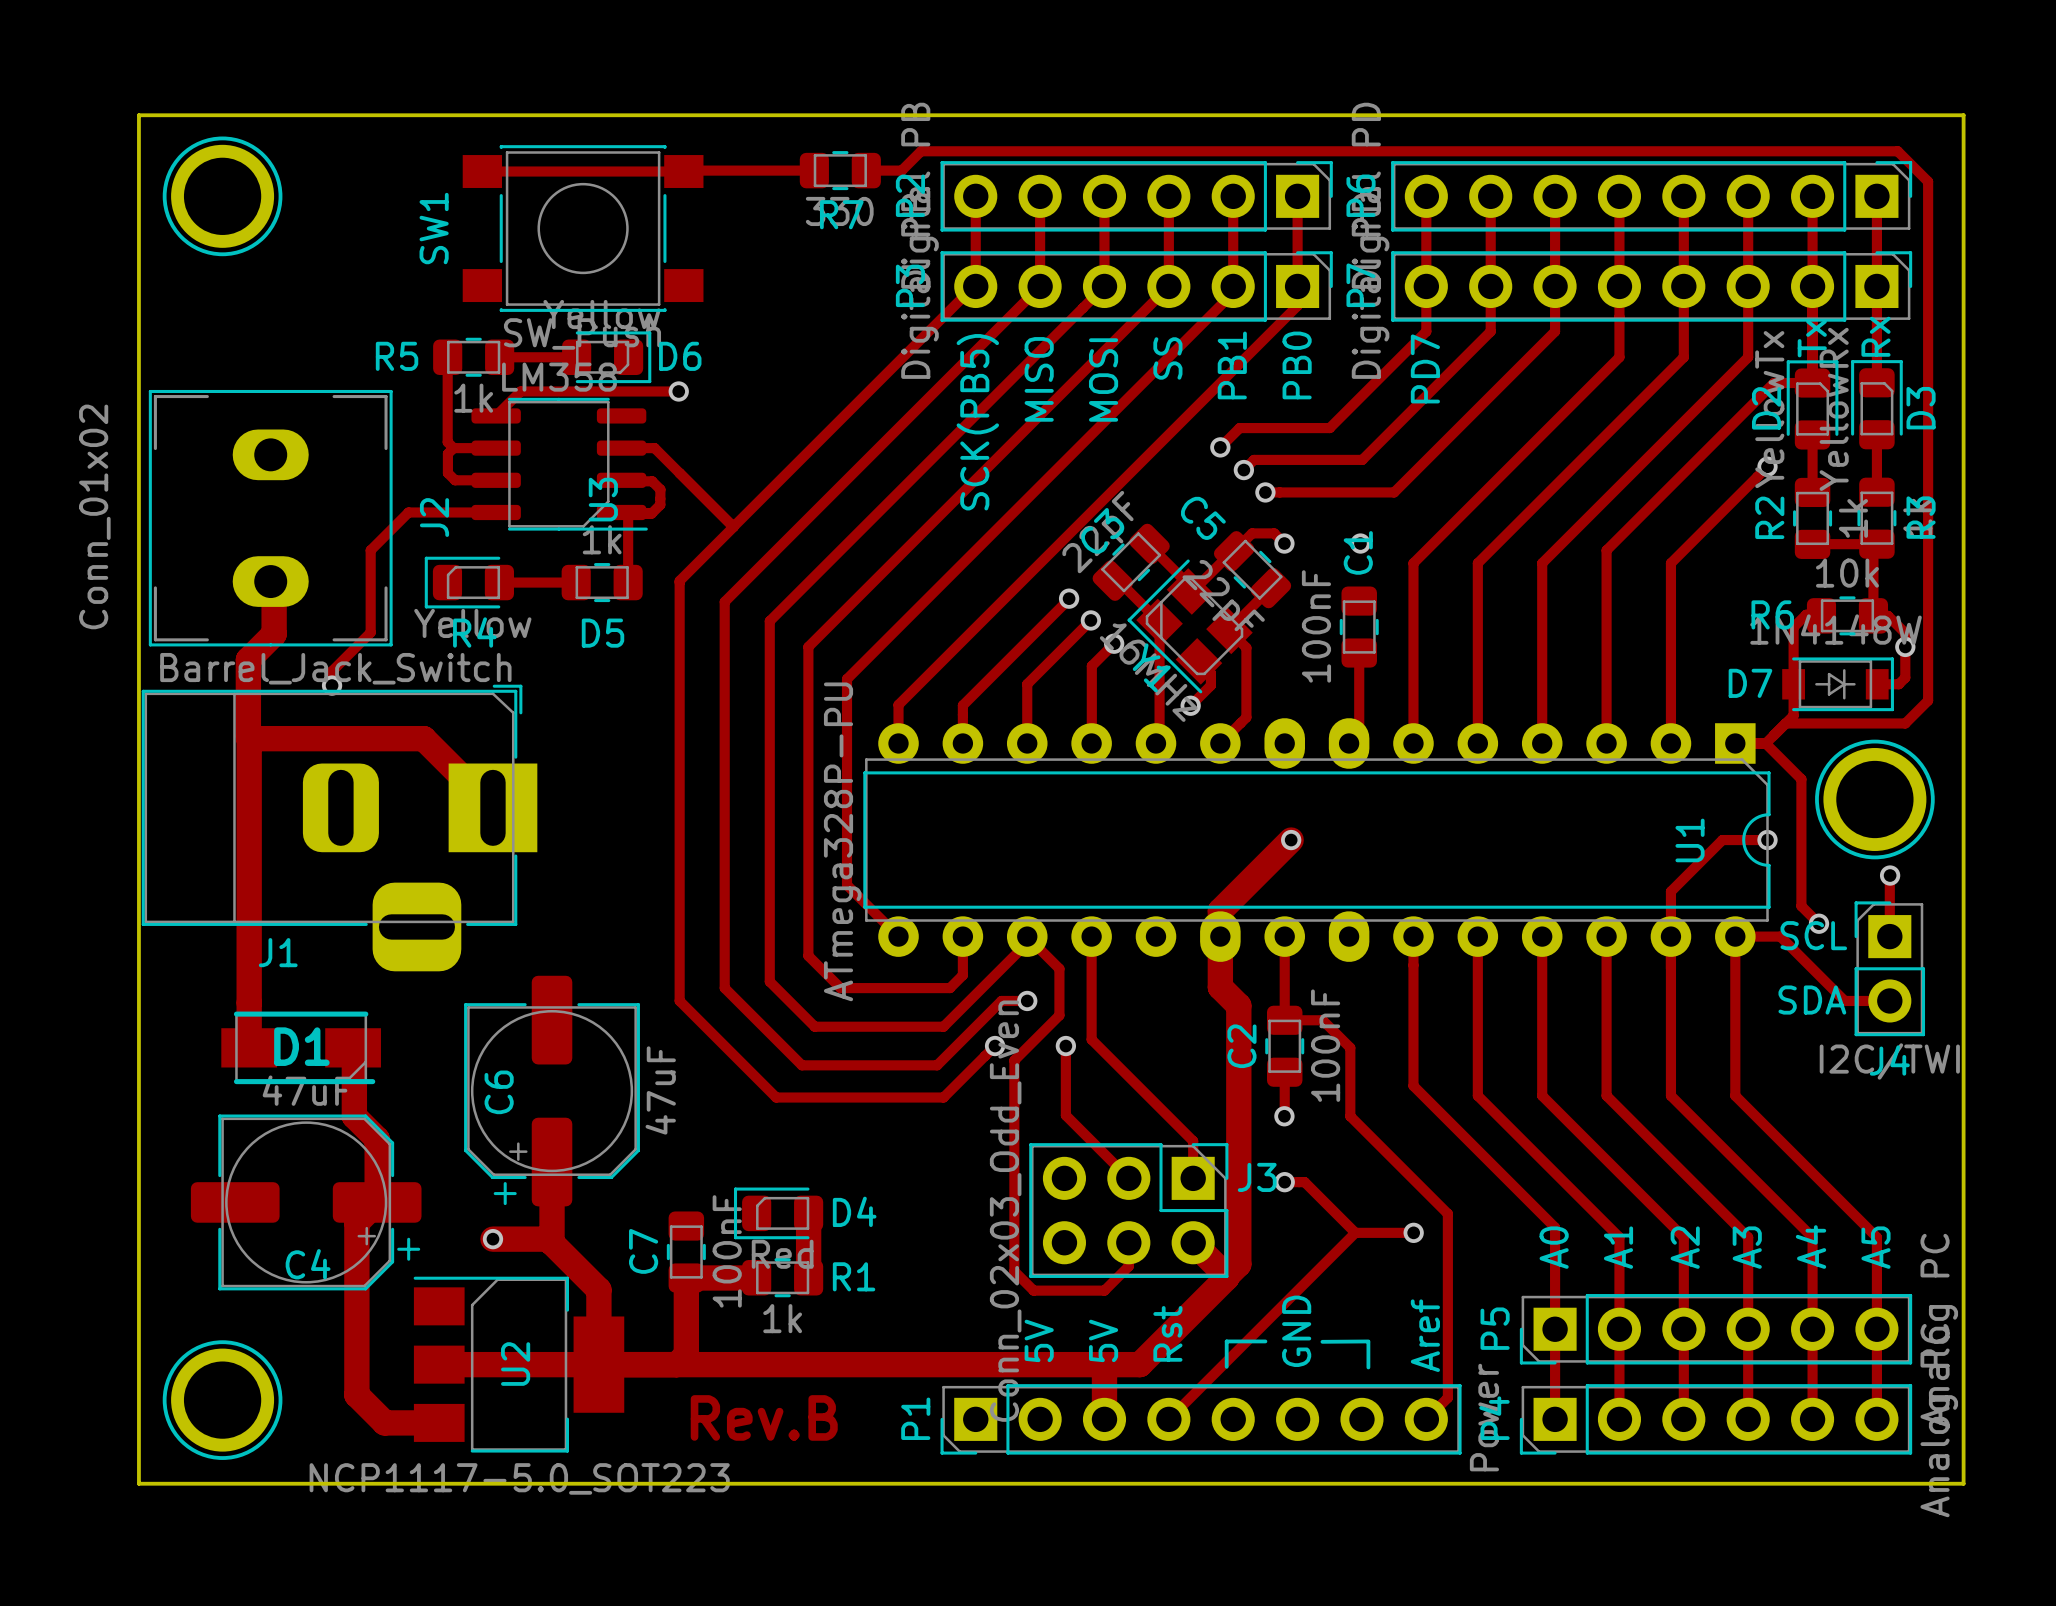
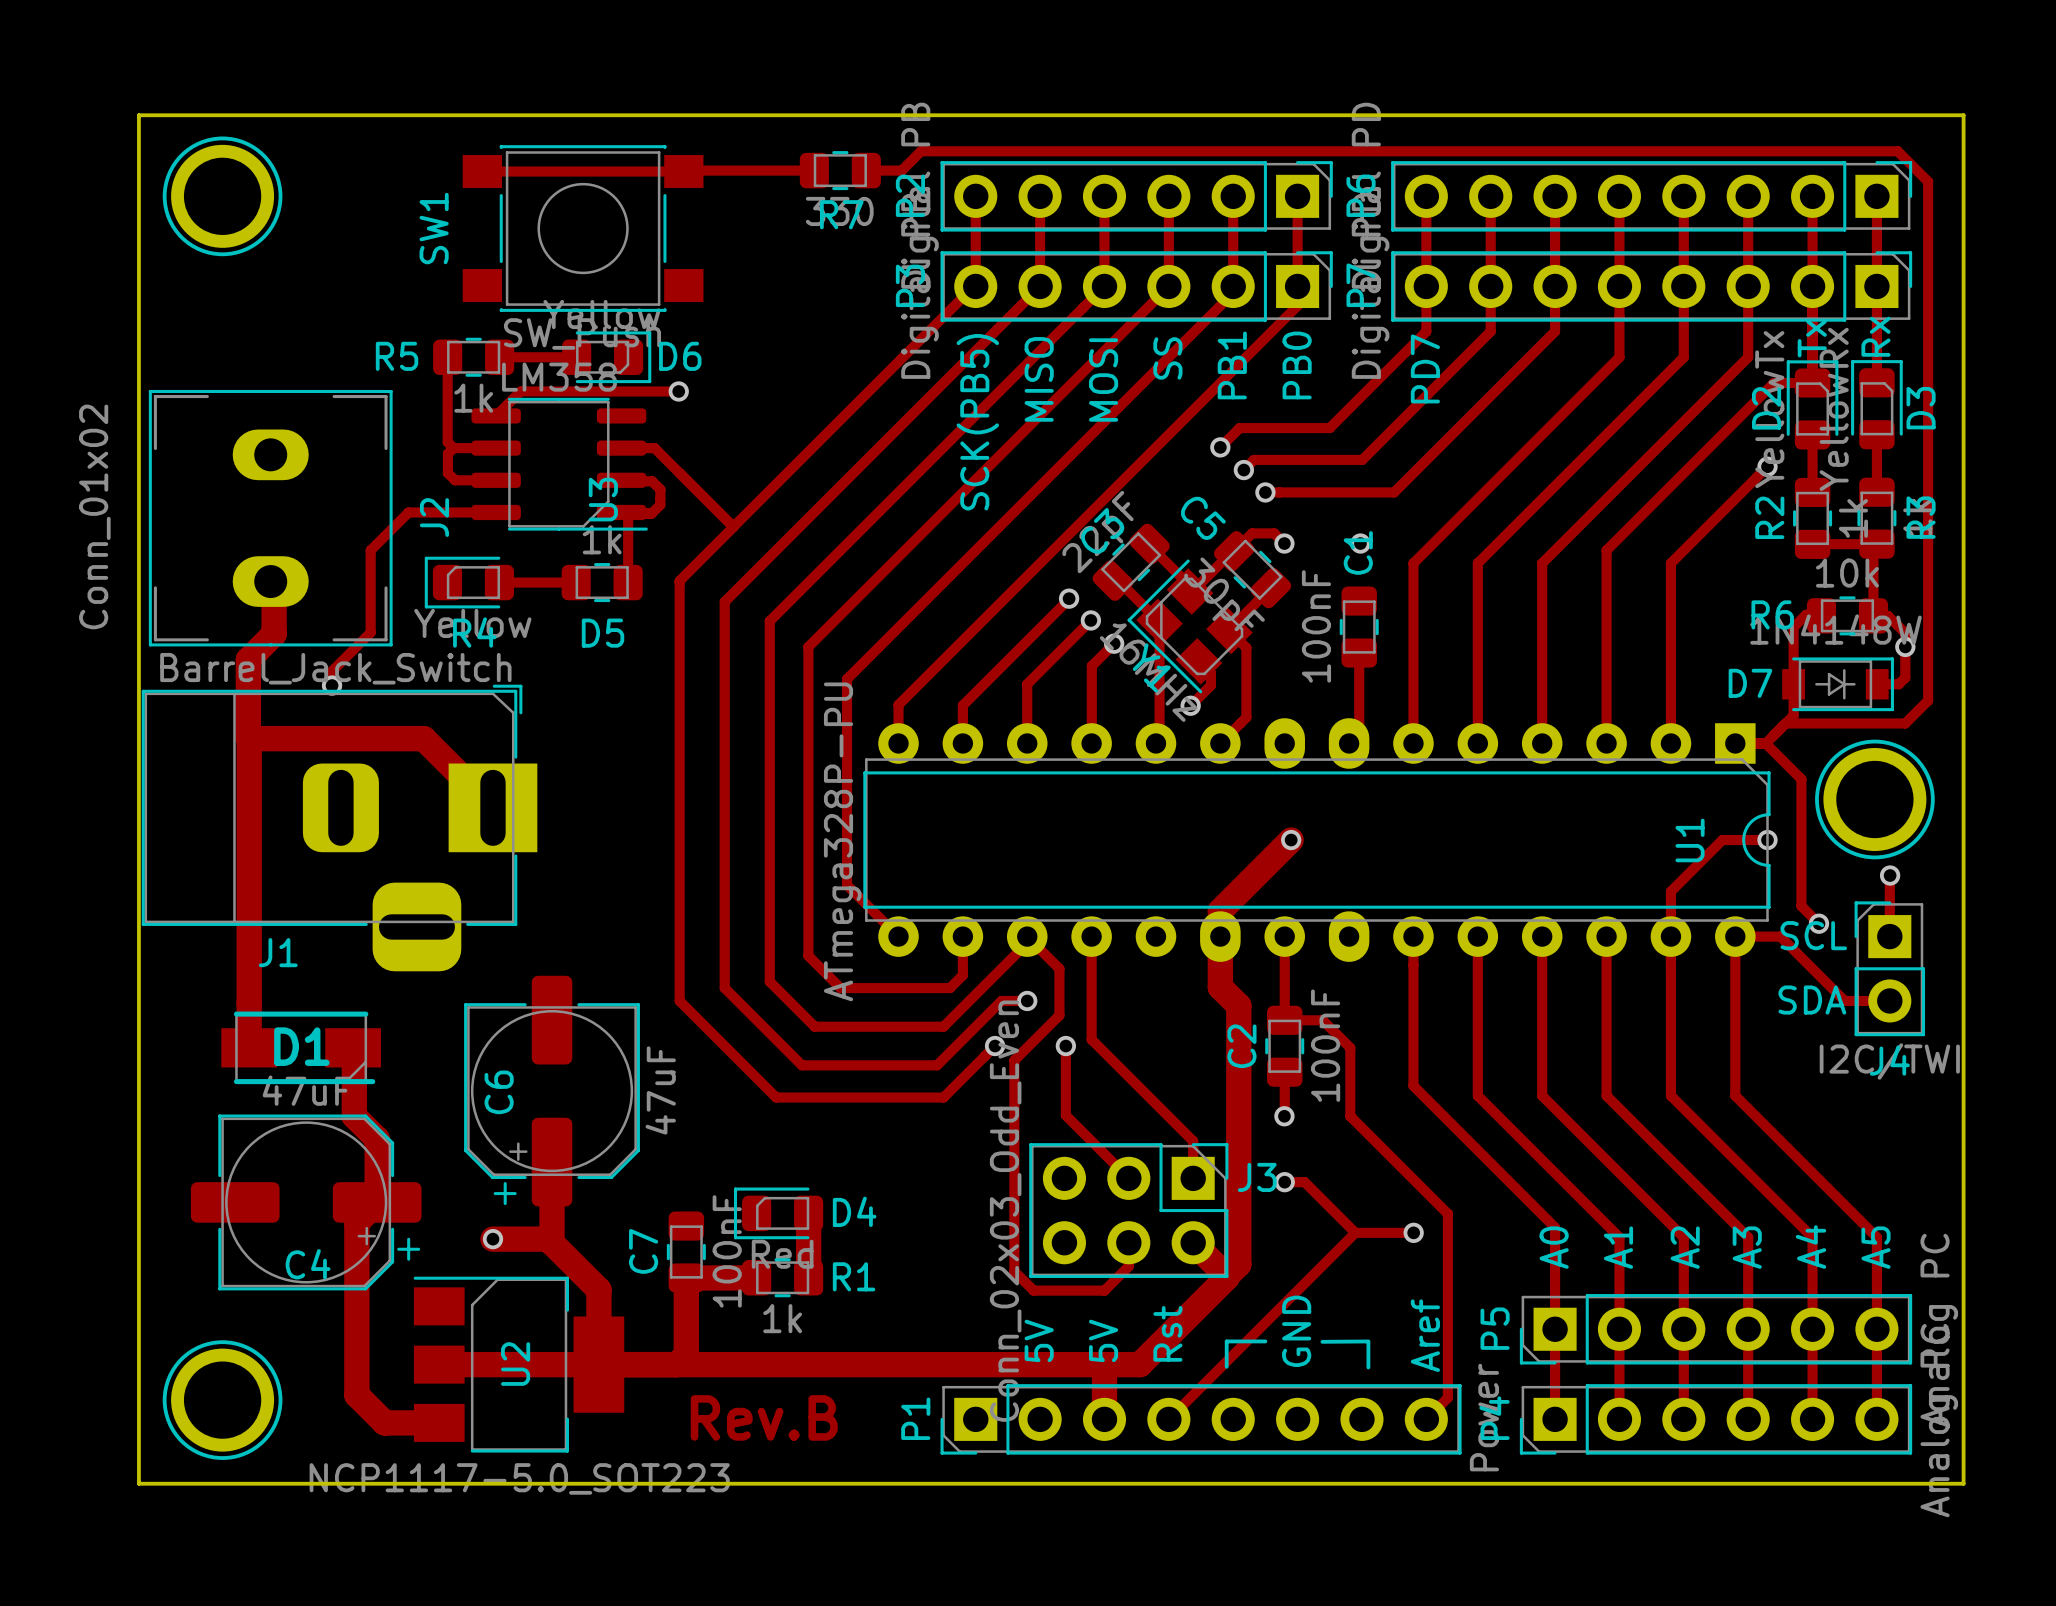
C5 value: 22pF (1223, 595) -> 30pF (1224, 594)

